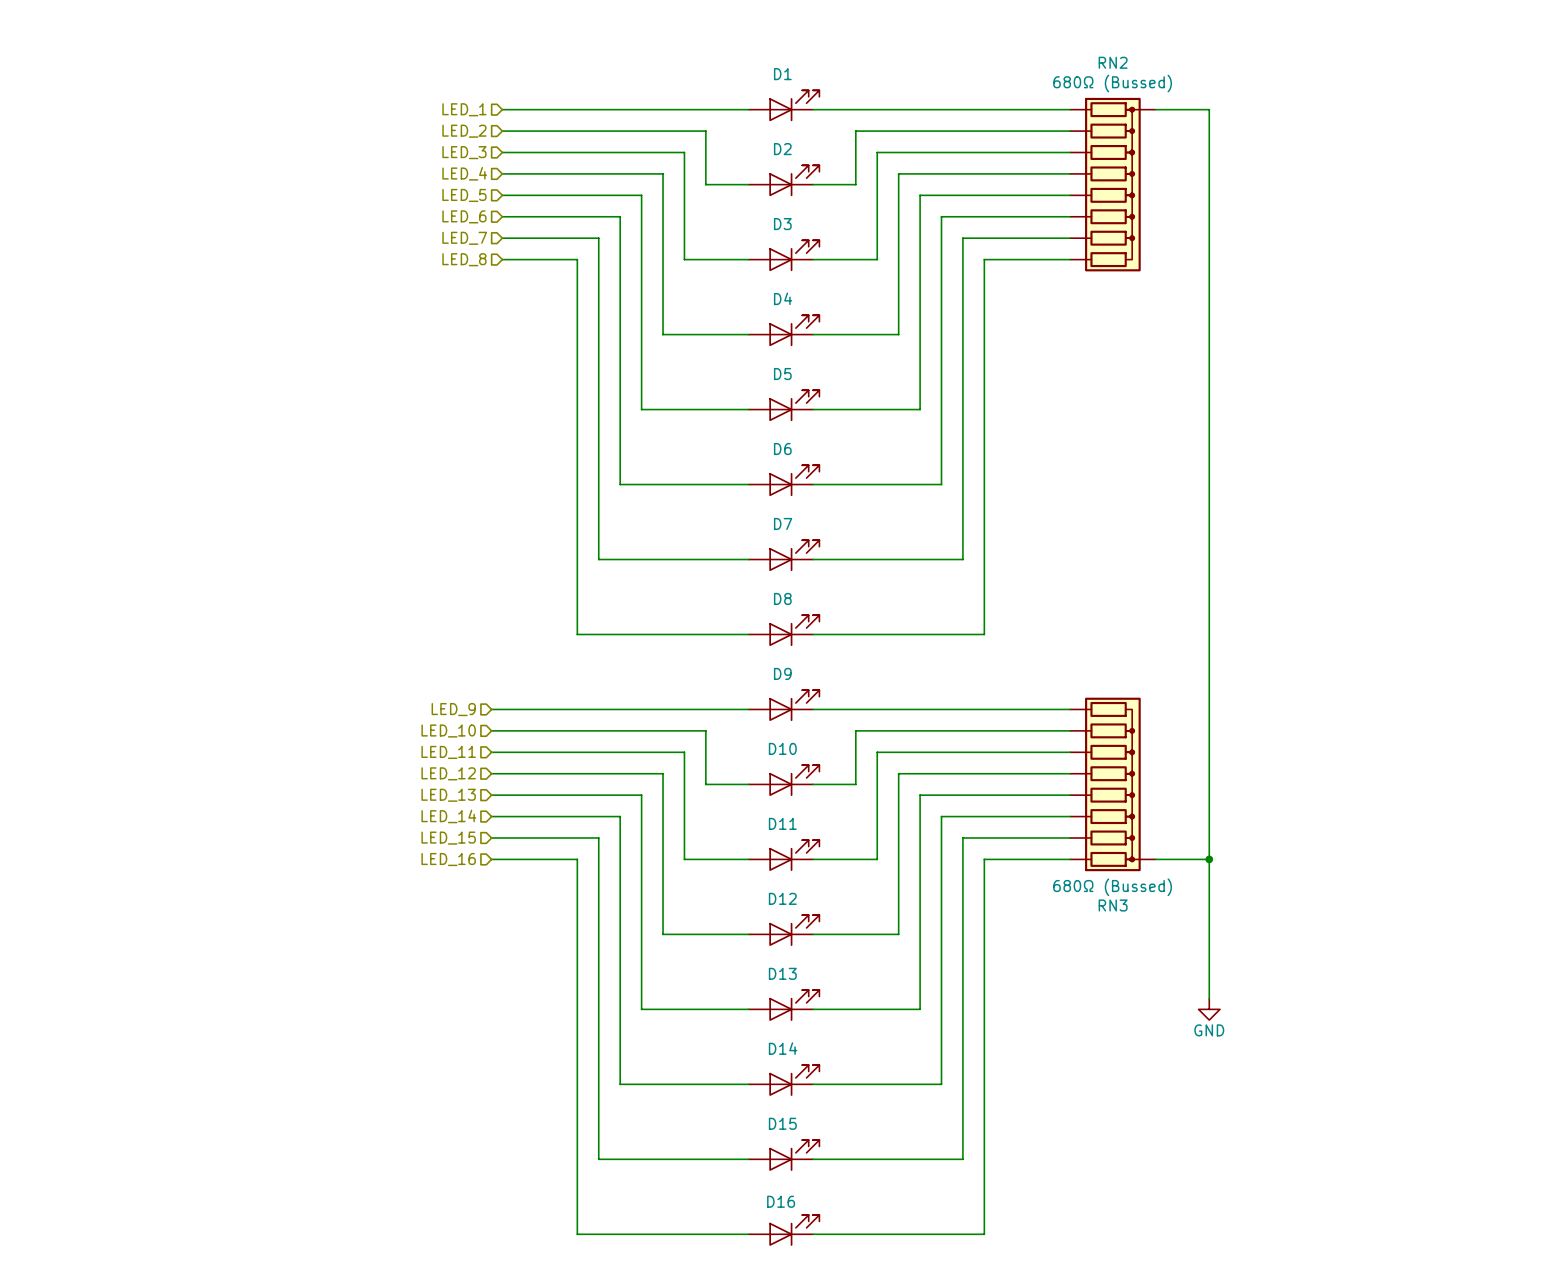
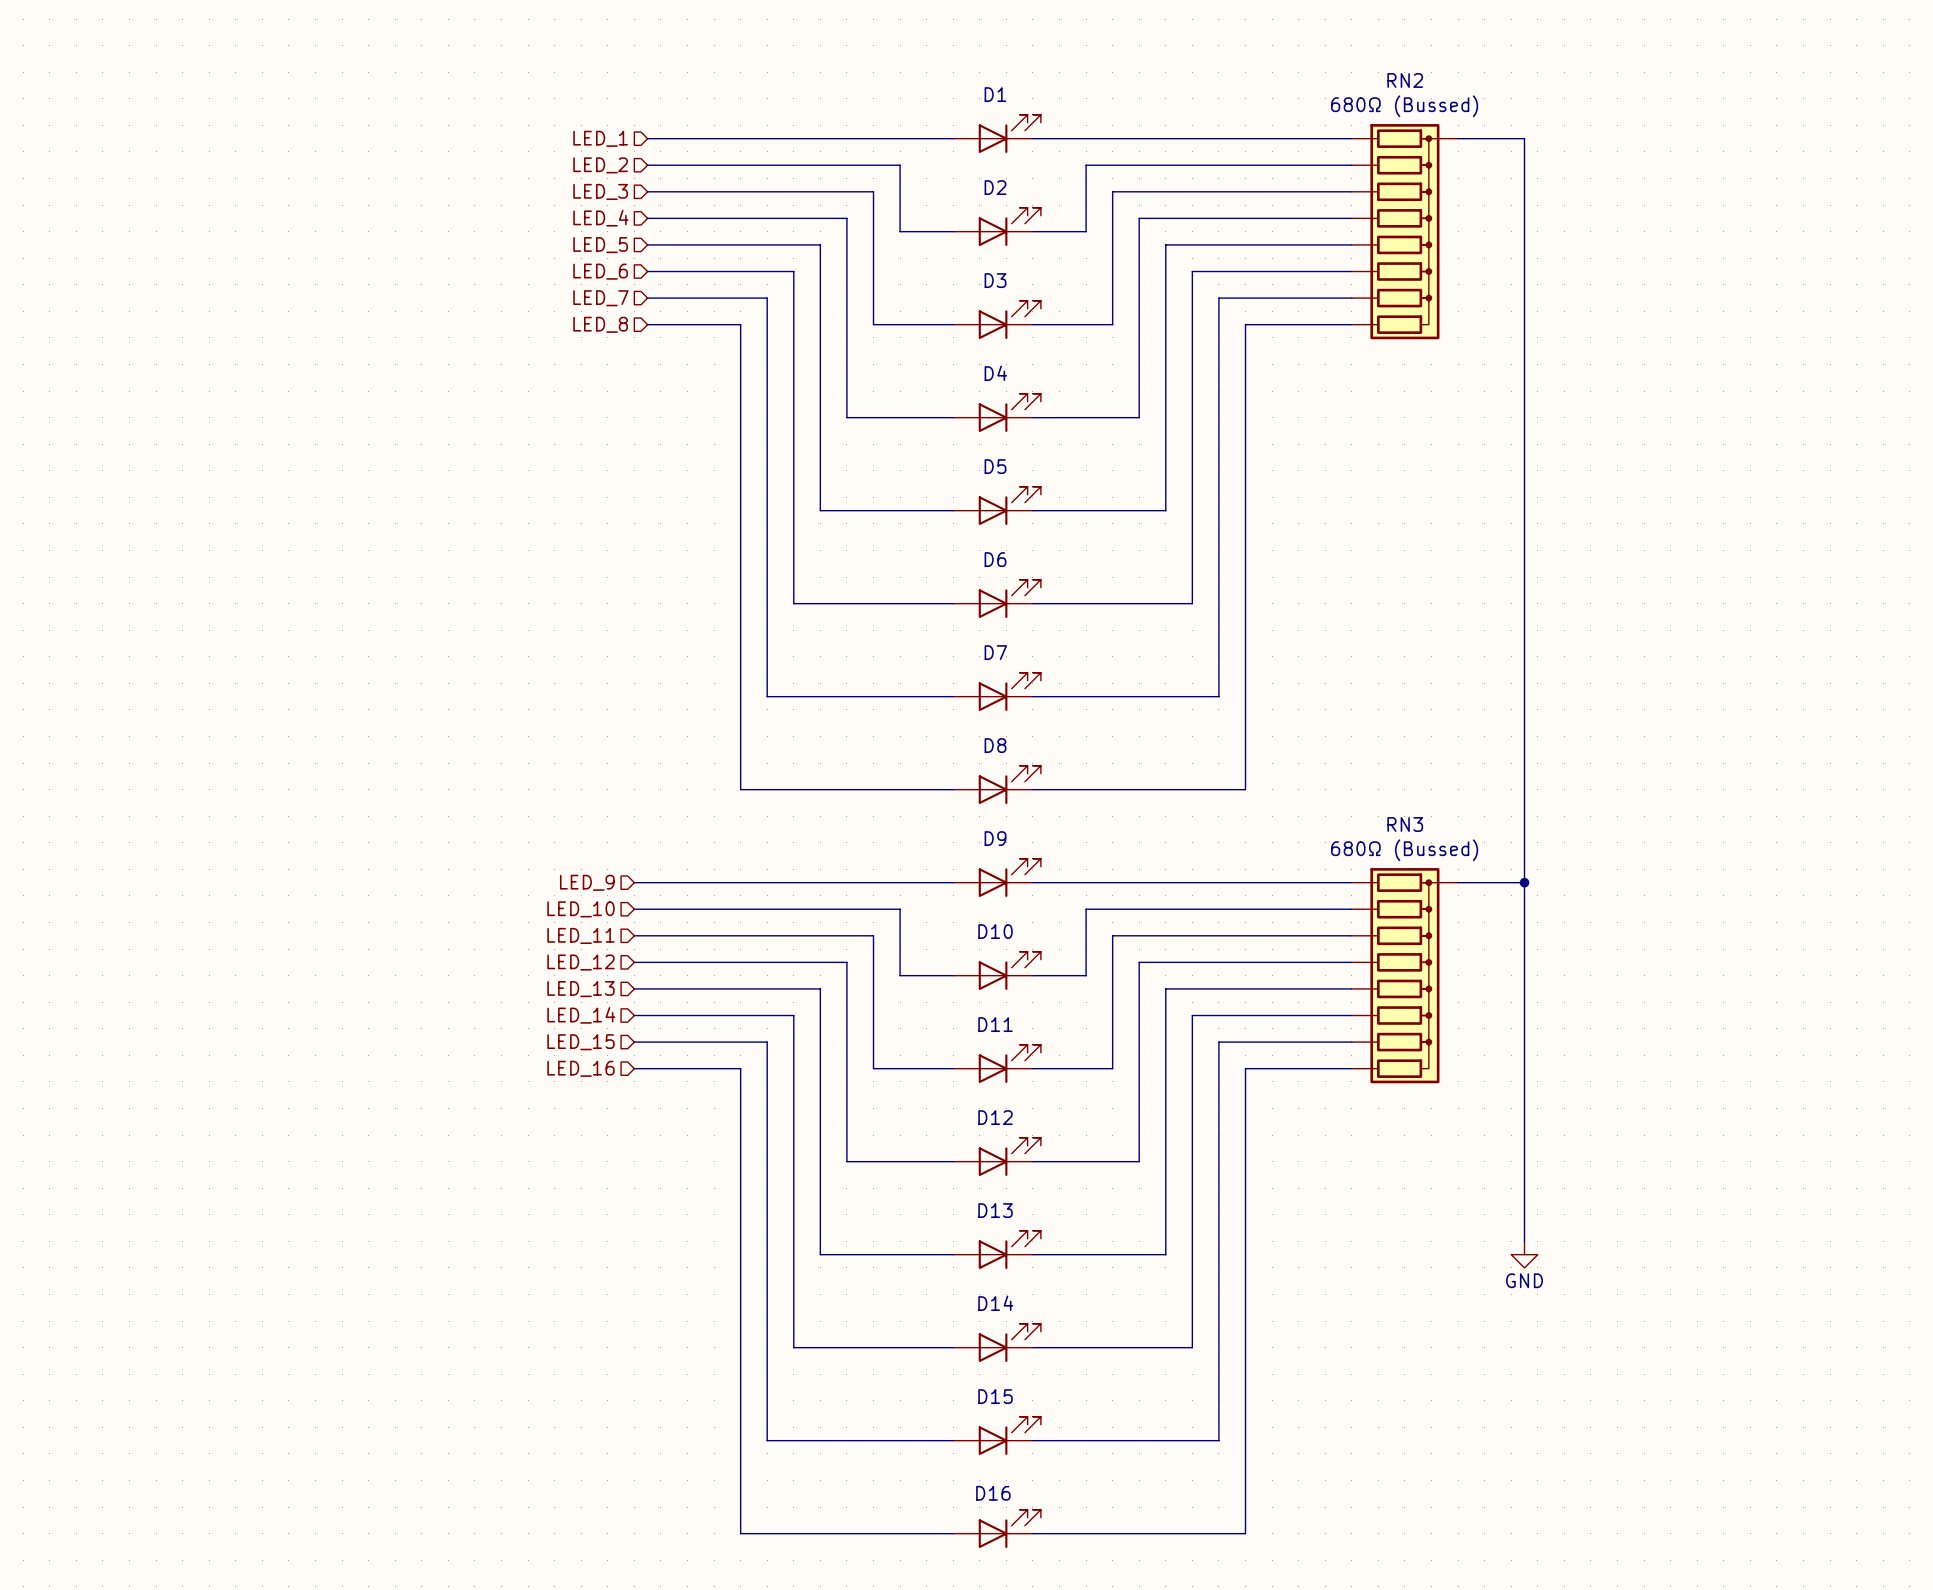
junction: none -> (1524, 882)
RN3 flip: as is (1112, 784) -> up-down (1404, 975)
wire: (1155, 859) (1209, 859) -> (1458, 882) (1524, 882)
junction: (1209, 859) -> none

